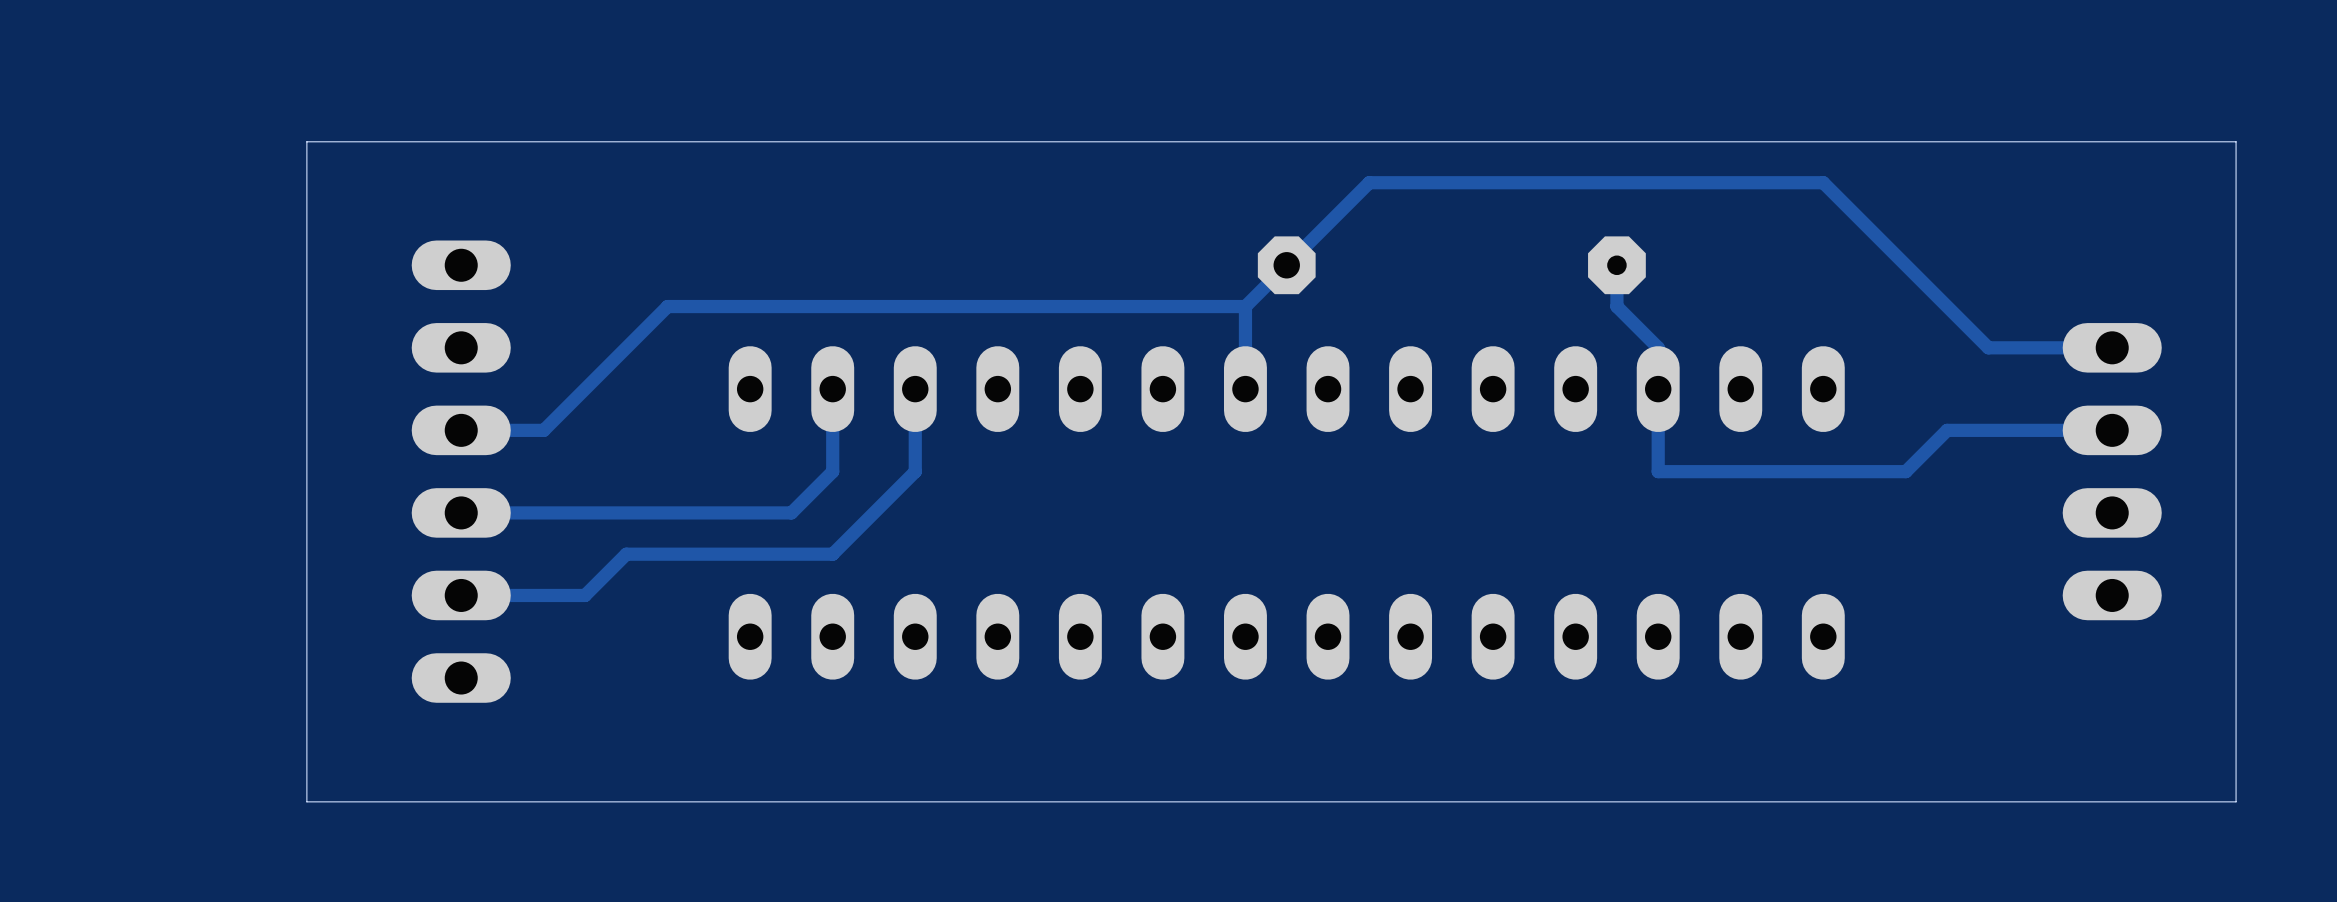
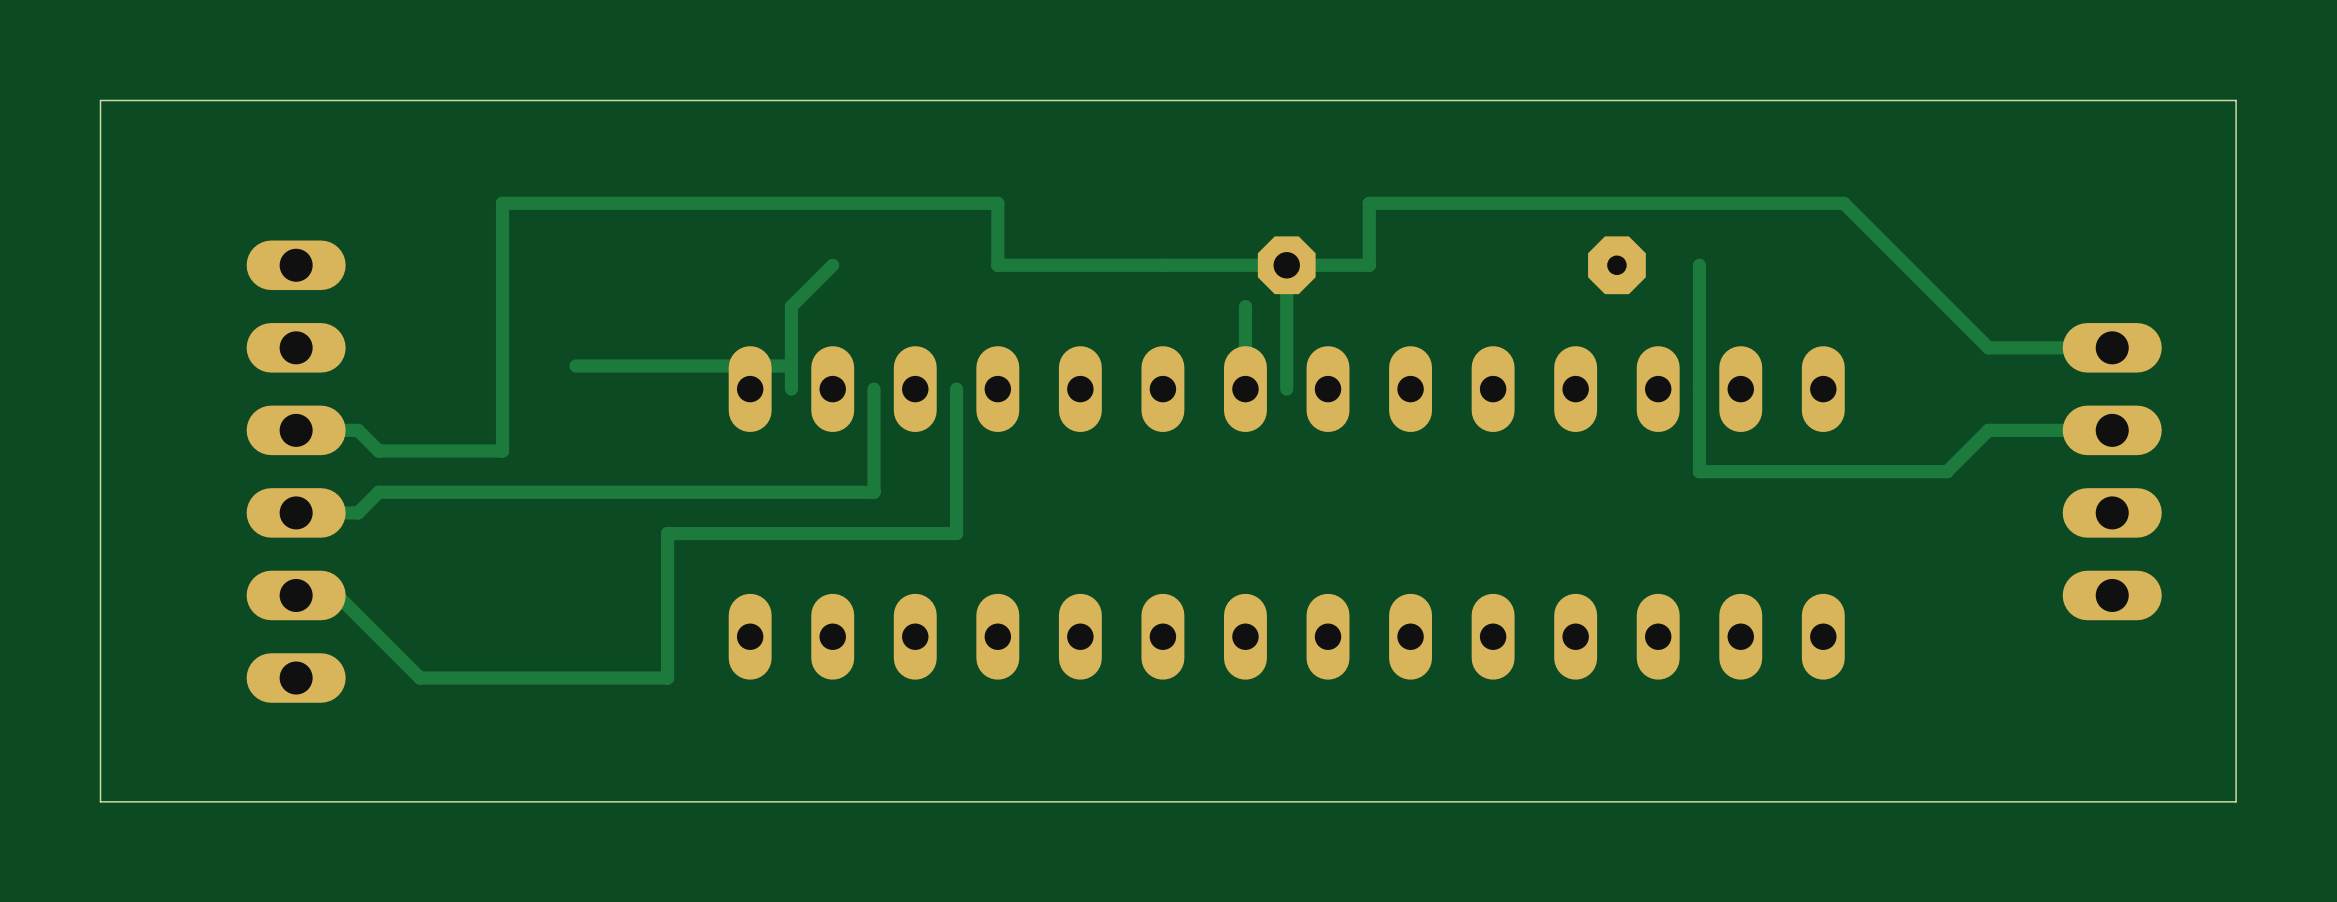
board edge: (2236, 141) (306, 141) (306, 801) -> (2236, 141) (2236, 100) (100, 100) (100, 801) (306, 801)
track: (1843, 203) (1823, 182) (1369, 182) (1245, 306) (667, 306) (543, 430) (461, 430) -> (1843, 203) (1369, 203) (1369, 265) (997, 265) (997, 203) (502, 203) (502, 451) (378, 451) (358, 430) (296, 430)
track: none -> (832, 265) (791, 306) (791, 389)
track: none -> (1286, 265) (1286, 389)
track: (1616, 265) (1616, 306) (1658, 347) (1658, 471) (1699, 471) -> (1699, 265) (1699, 471)
track: none -> (575, 365) (788, 365) (791, 368)
track: (832, 389) (832, 471) (791, 512) (461, 512) -> none
track: none -> (873, 389) (873, 492) (378, 492) (358, 512) (296, 512)
track: (915, 389) (915, 471) (832, 554) (626, 554) (585, 595) (461, 595) -> none
track: none -> (956, 389) (956, 533) (667, 533) (667, 678) (419, 678) (337, 595) (296, 595)
track: (1988, 430) (1947, 430) (1905, 471) -> (1988, 430) (1947, 471) (1905, 471)
part position: (461, 471) -> (296, 471)

